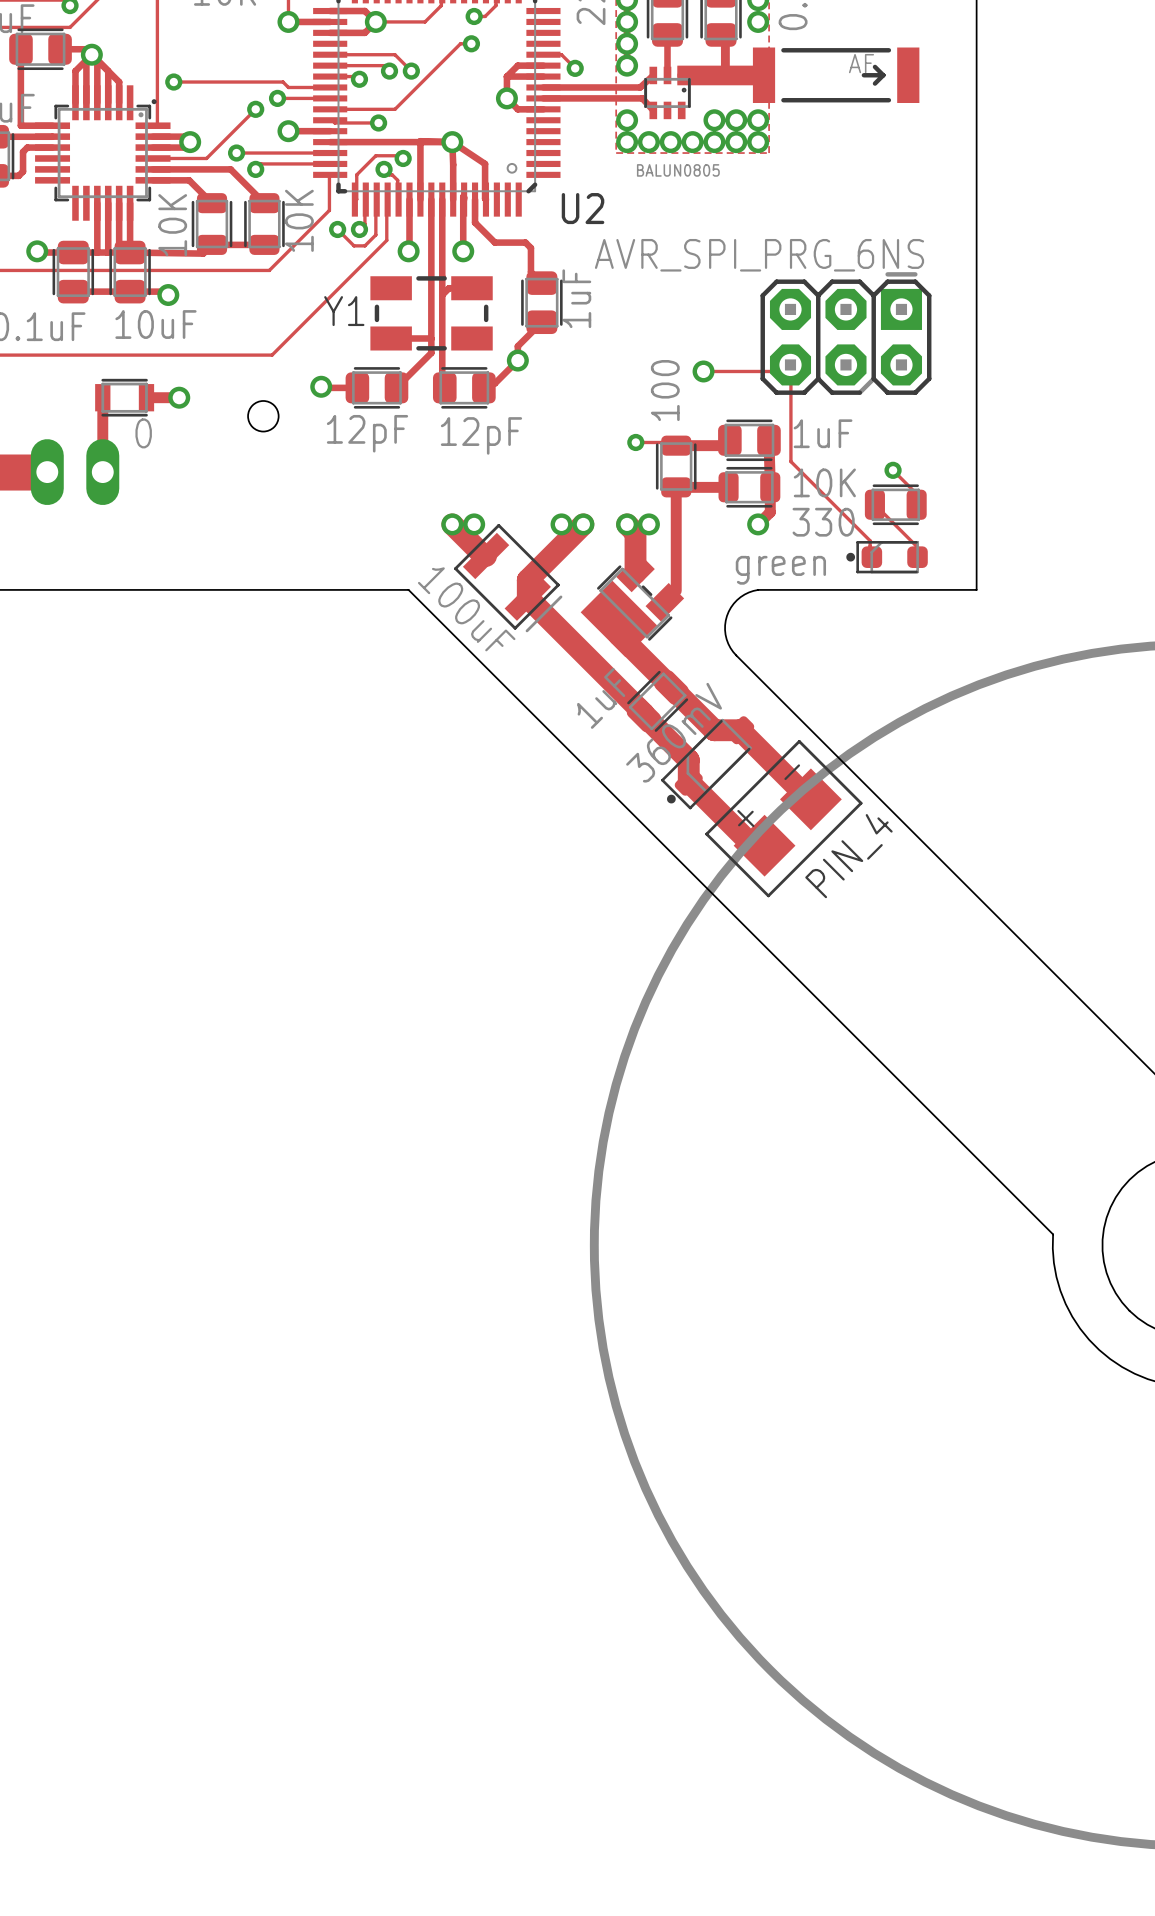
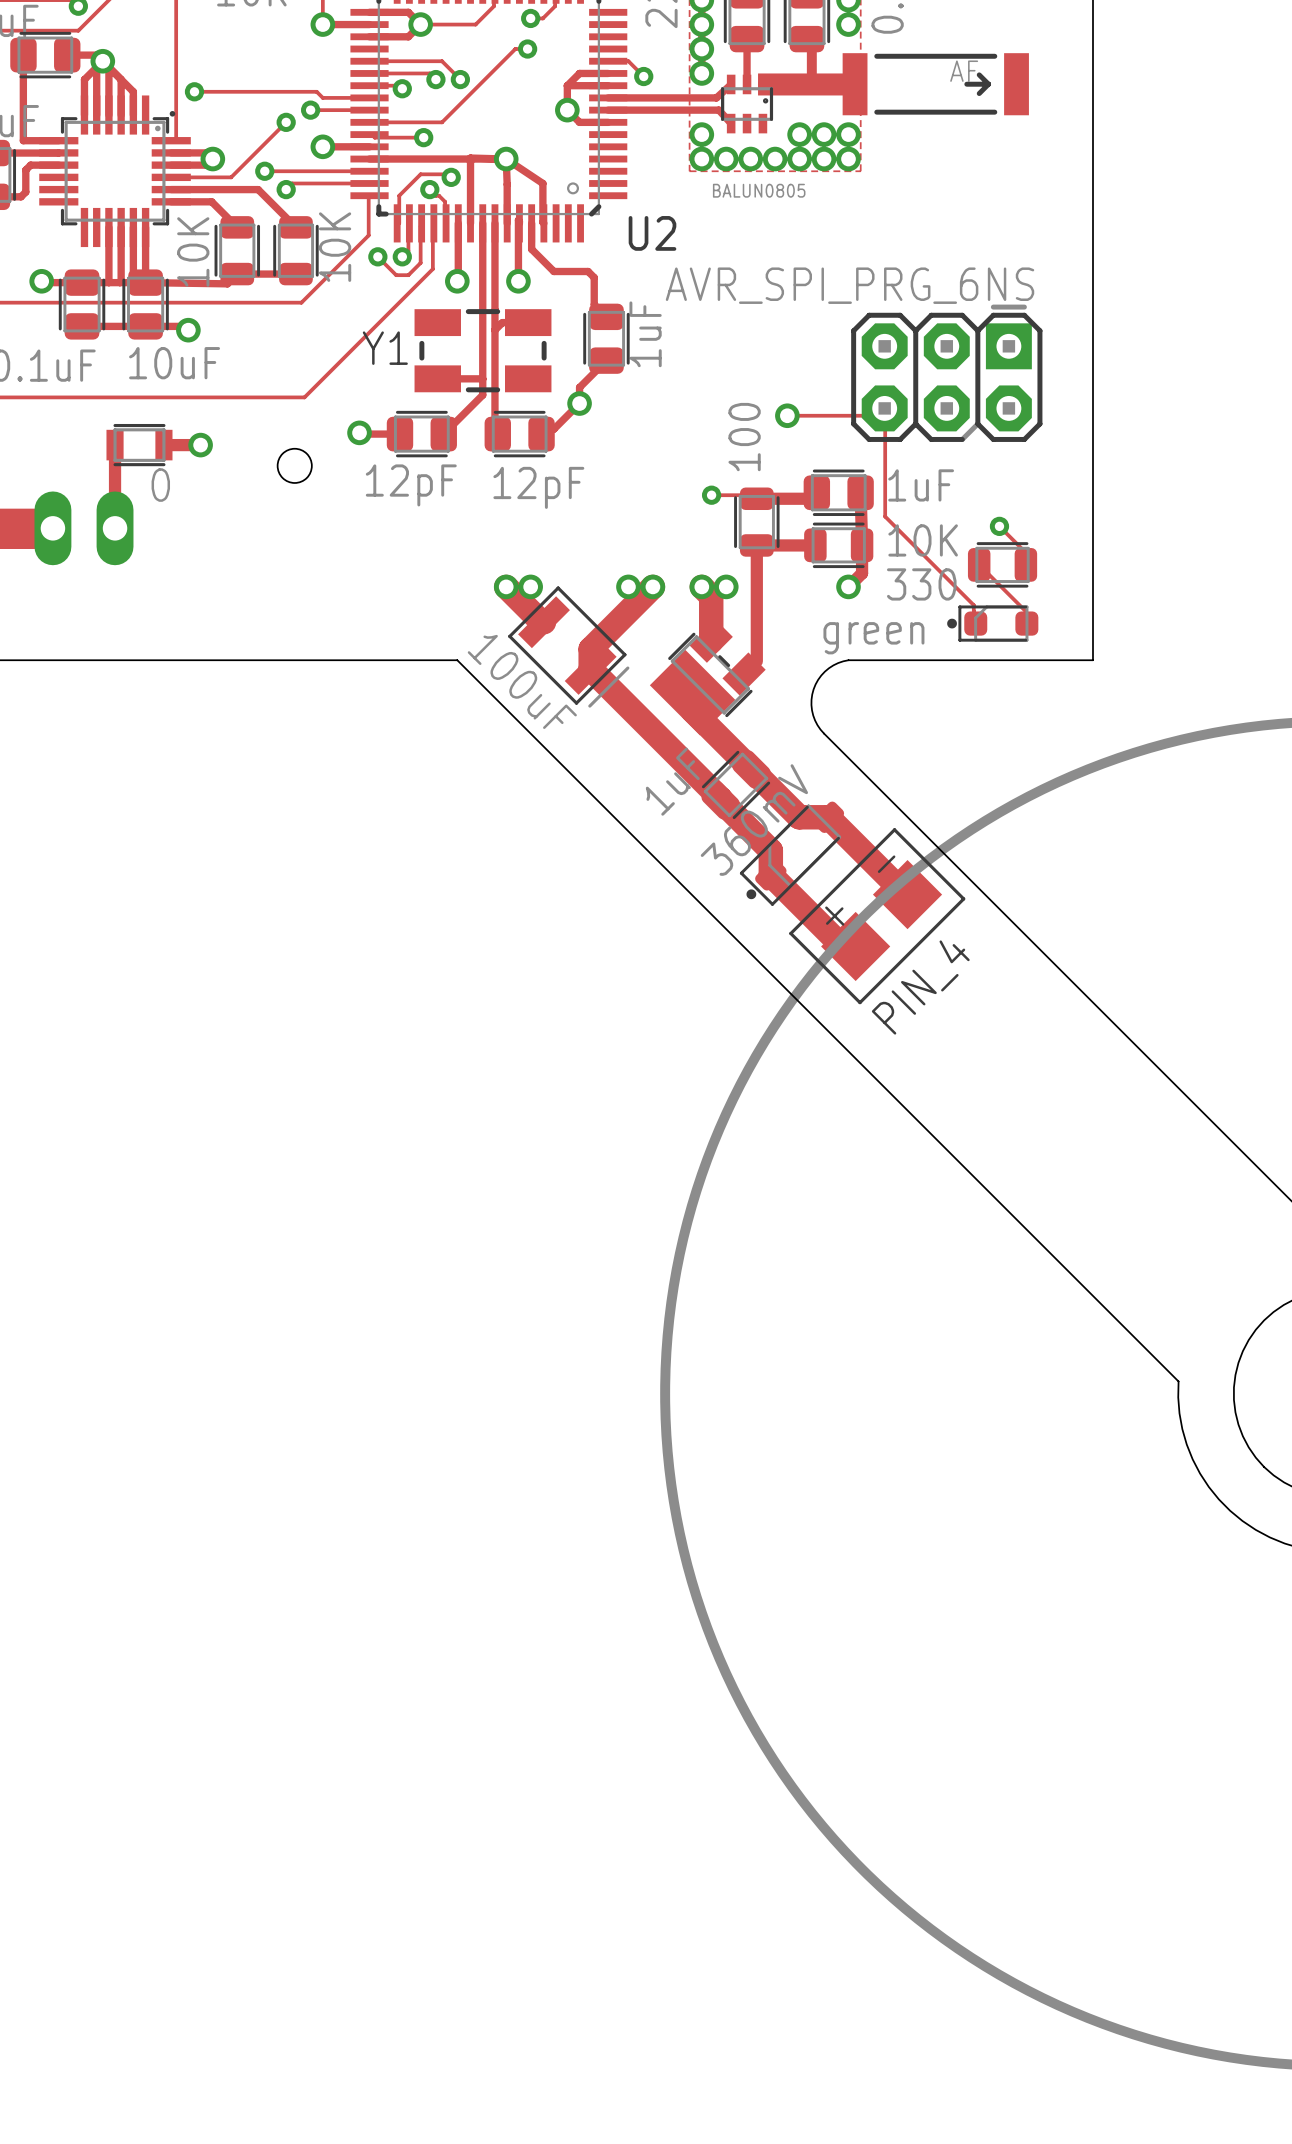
PIN_4 name position: PIN_4 (848, 856) -> PIN_4 (920, 987)

